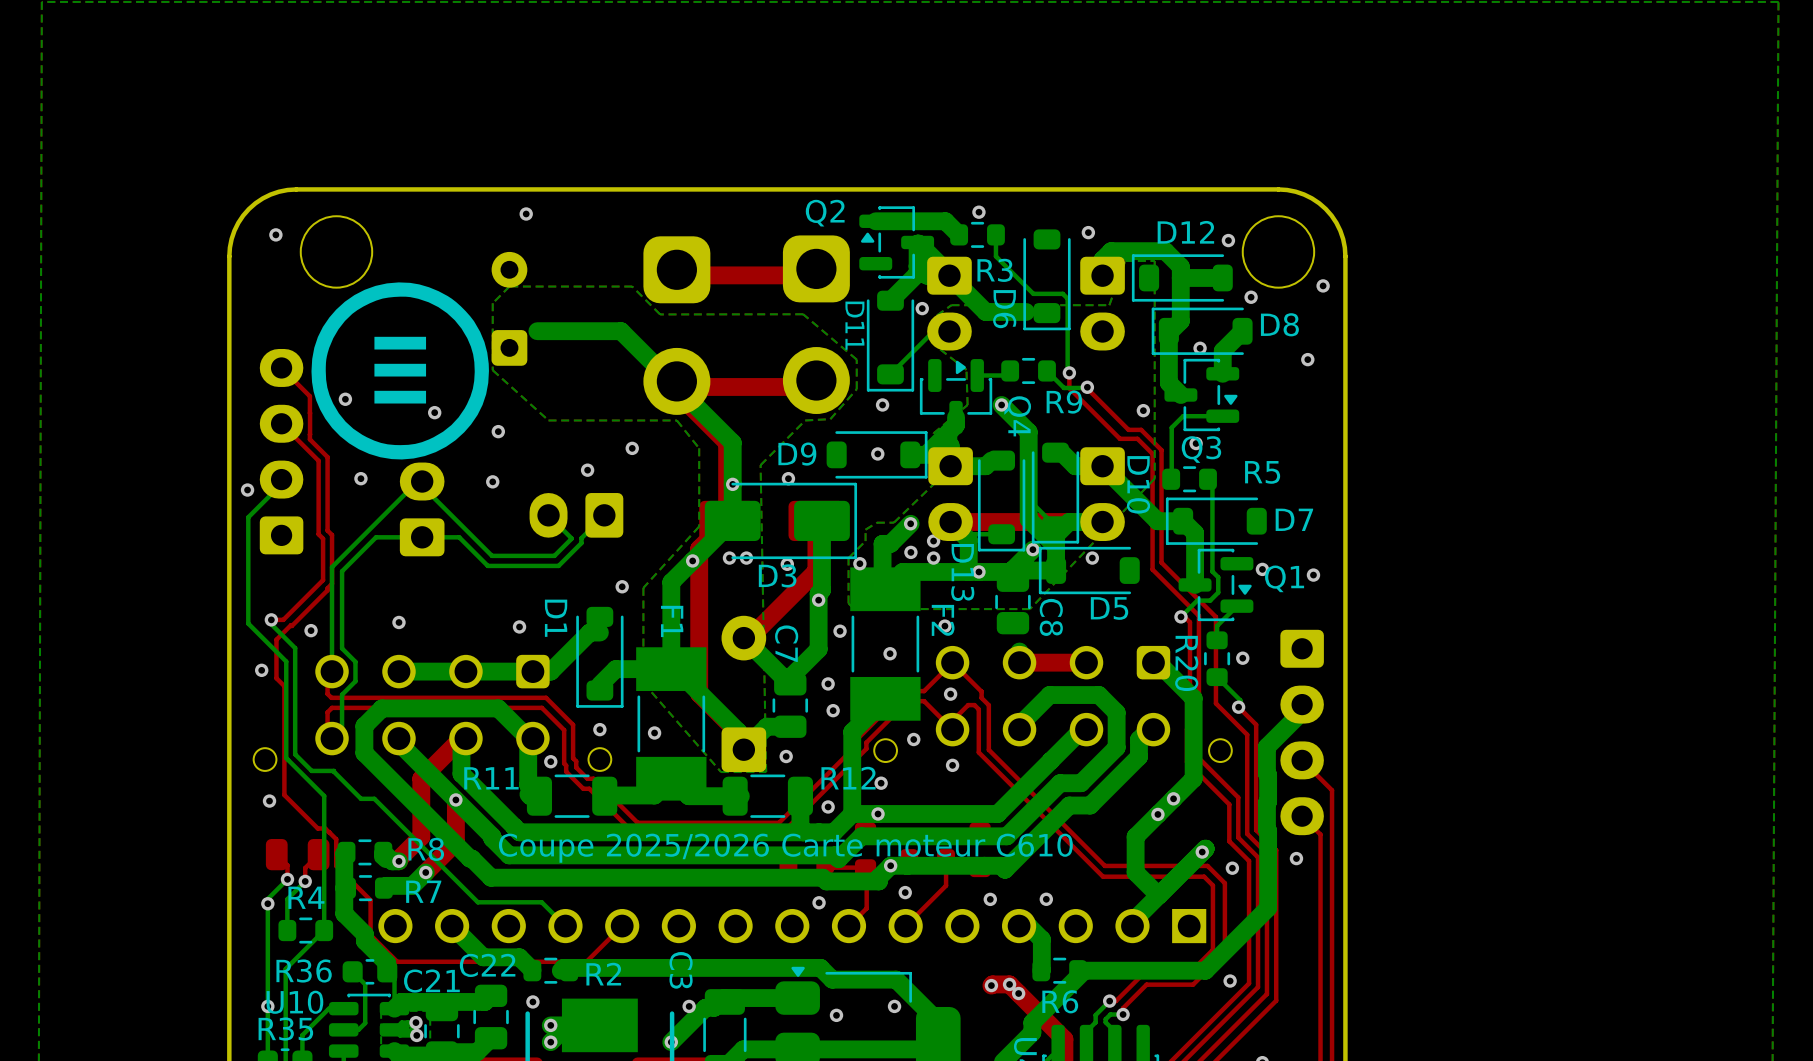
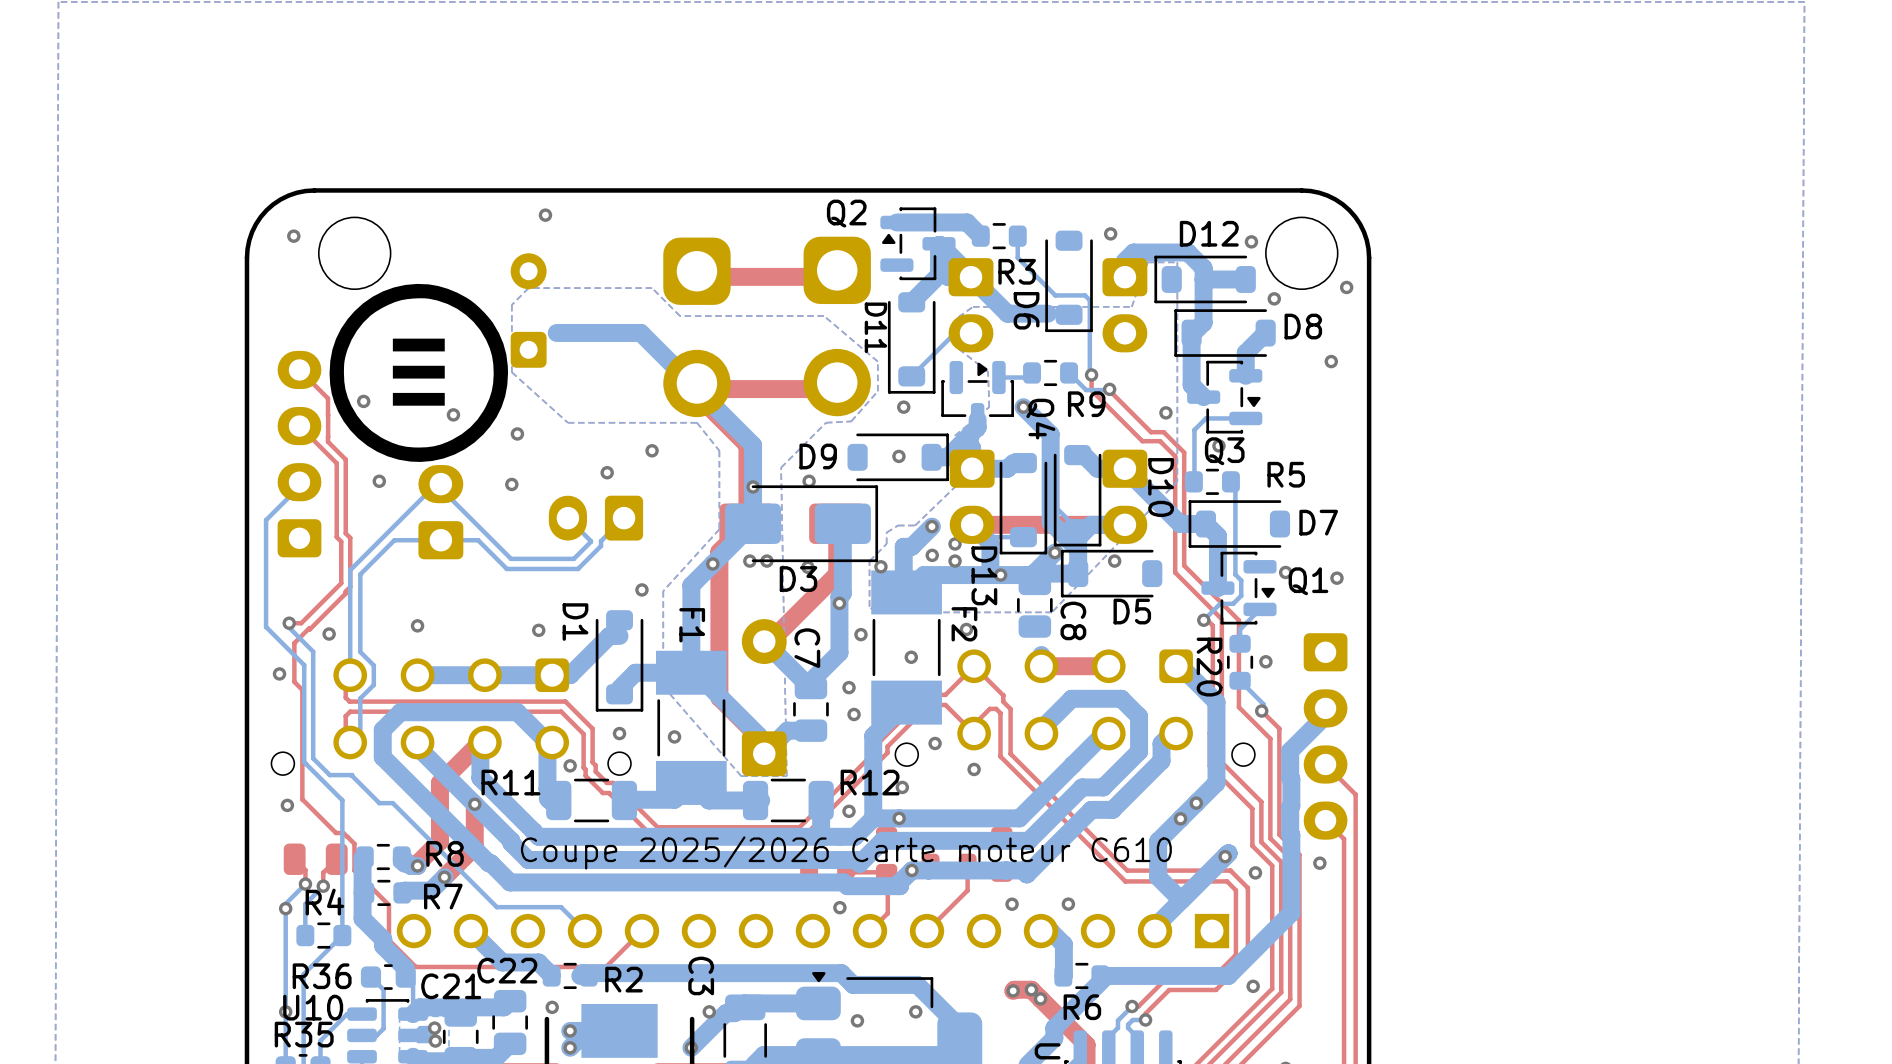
via: (978, 212) -> none
via: (922, 308) -> none
via: (1200, 348) -> none
via: (247, 490) -> none
via: (950, 694) -> none
via: (786, 756) -> none
via: (905, 892) -> none

